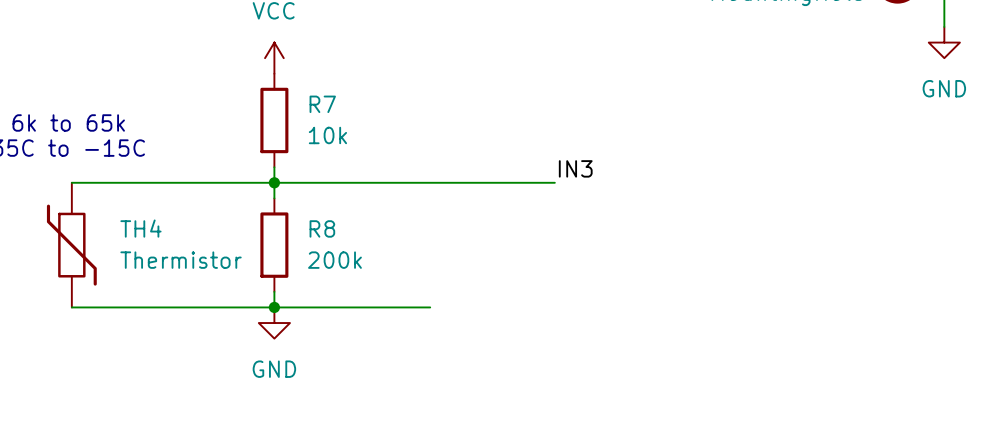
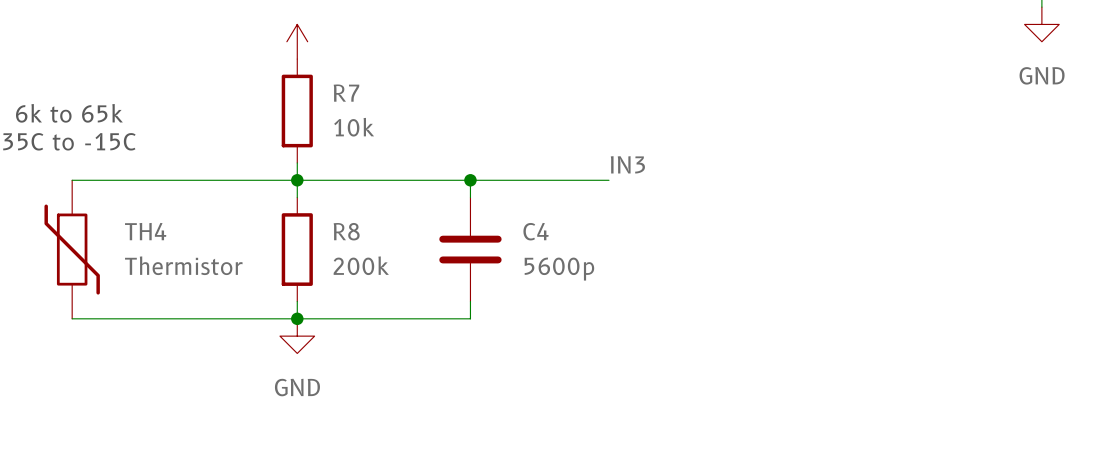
wire: none -> (470, 180) (470, 197)
junction: none -> (470, 180)
C4: none -> 5600p (470, 249)
wire: none -> (470, 301) (470, 318)

